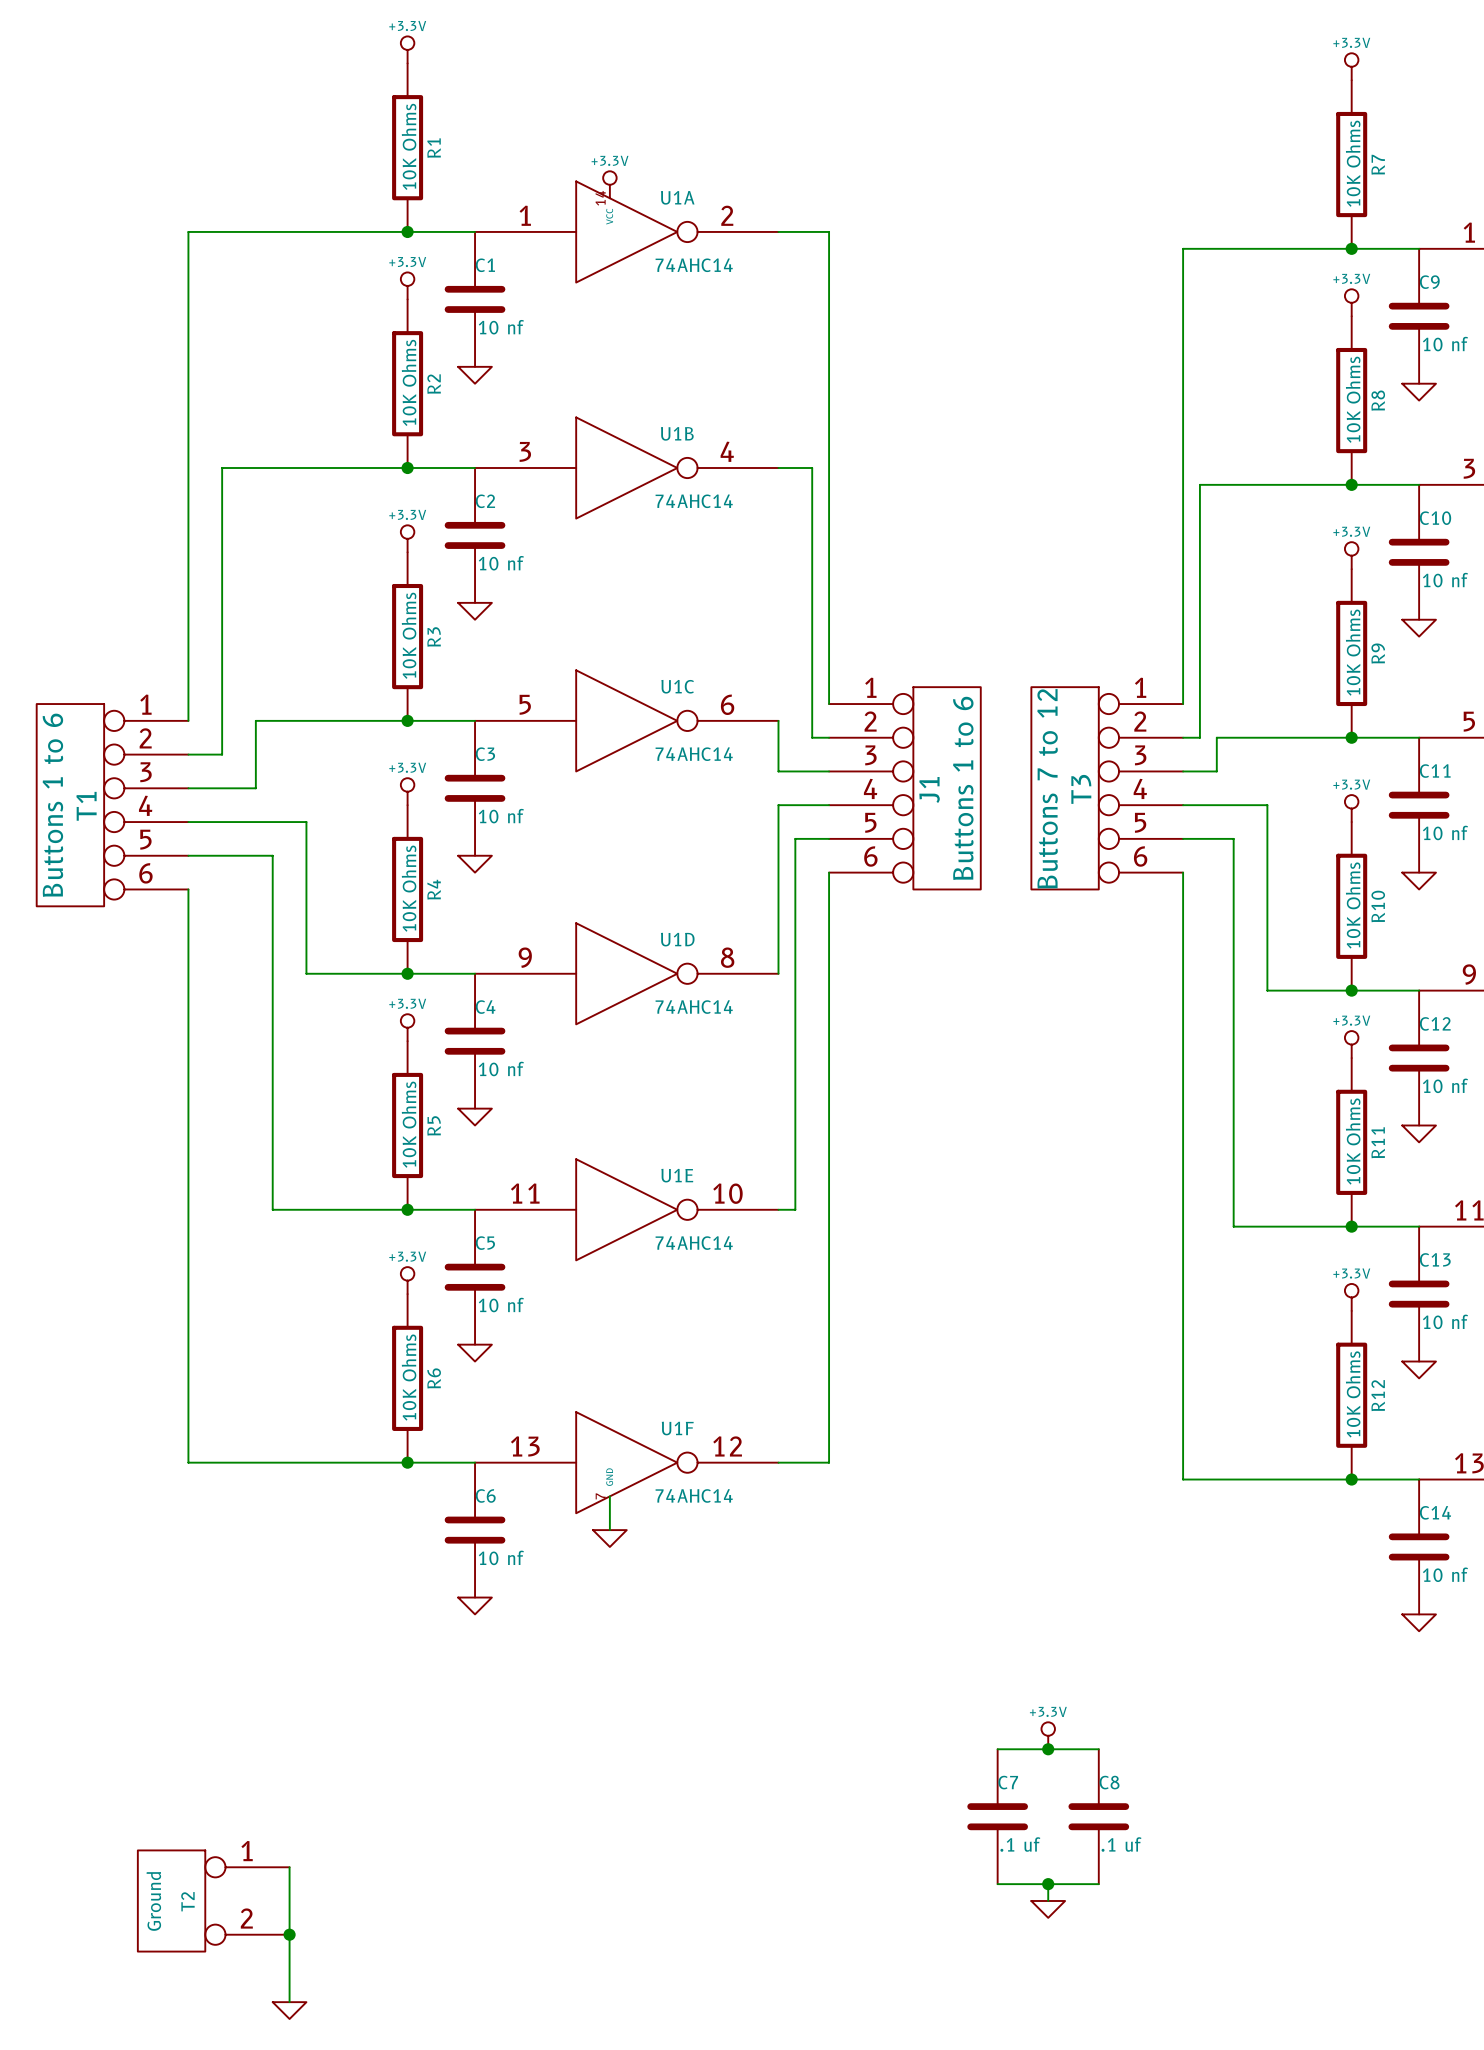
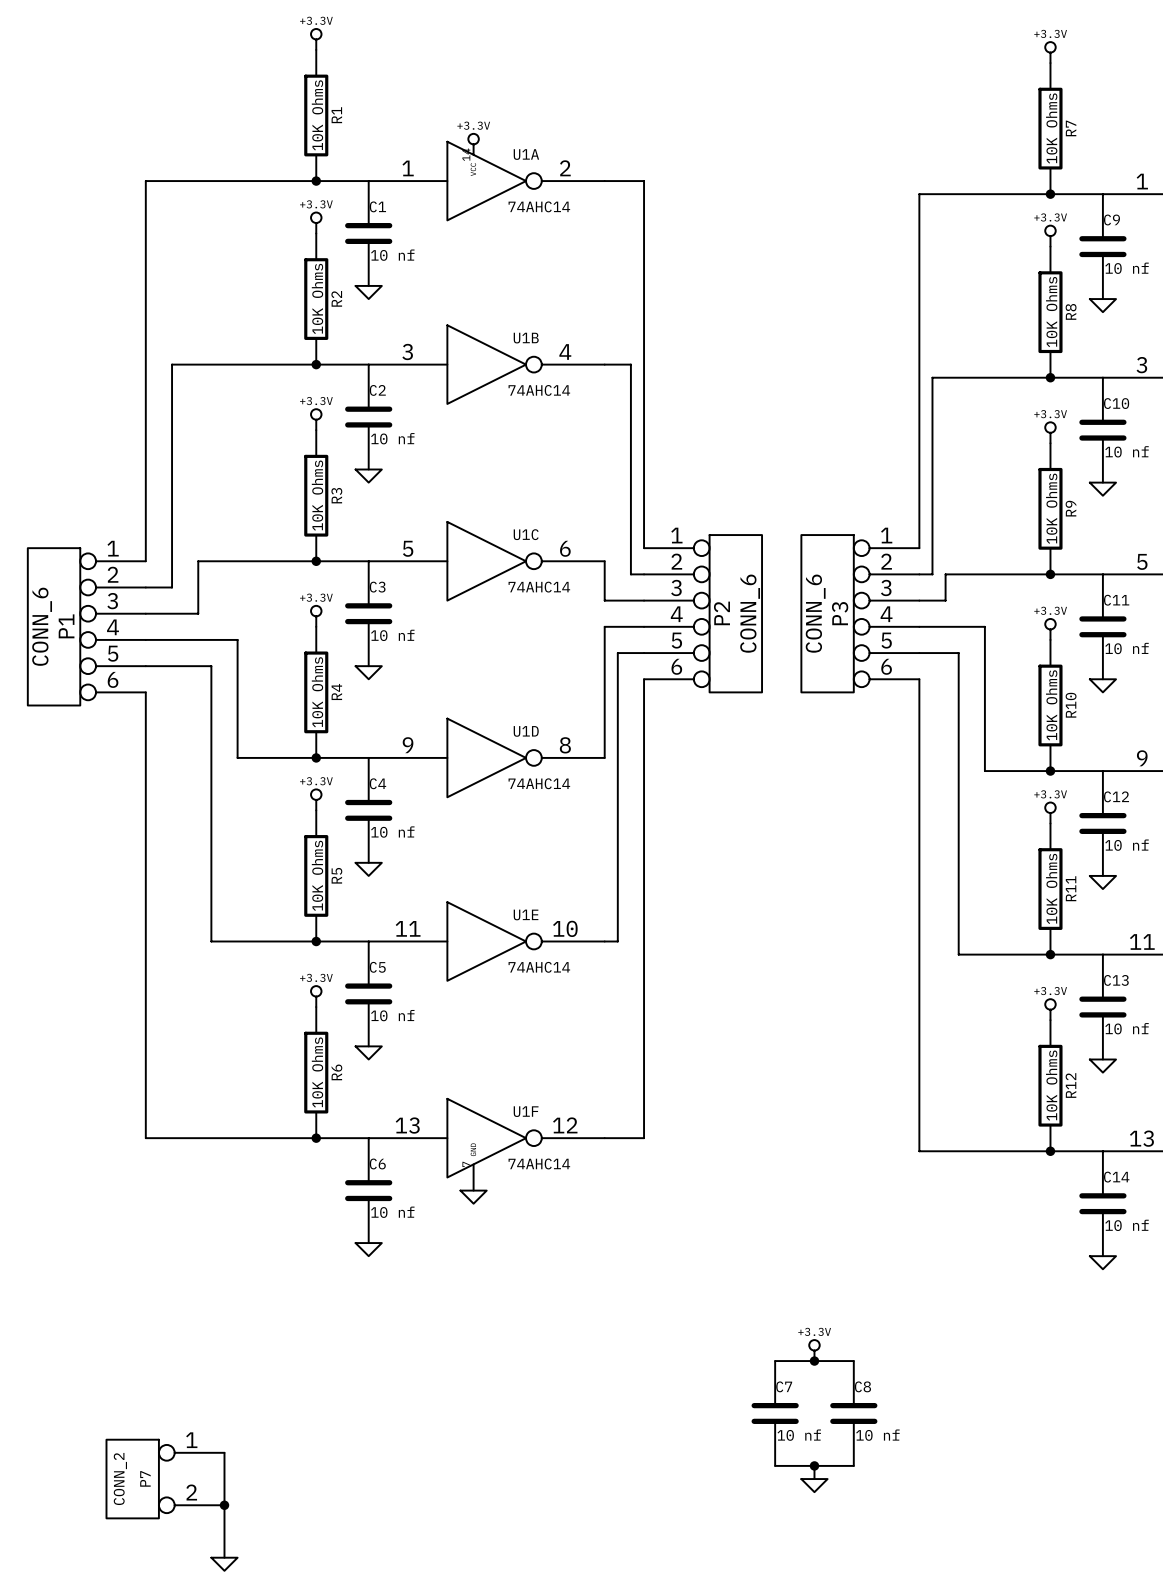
J1 value: Buttons 1 to 6 (963, 788) -> CONN_6 (750, 613)
T3 value: Buttons 7 to 12 (1047, 788) -> CONN_6 (815, 613)
J1 name: J1 (929, 789) -> P2 (721, 613)
T3 name: T3 (1081, 789) -> P3 (840, 613)
T1 value: Buttons 1 to 6 (52, 805) -> CONN_6 (42, 626)
T1 name: T1 (86, 806) -> P1 (66, 626)
C7 value: .1 uf (1020, 1844) -> 10 nf (799, 1435)
C8 value: .1 uf (1121, 1844) -> 10 nf (877, 1435)
T2 value: Ground (153, 1901) -> CONN_2 (120, 1478)
T2 name: T2 (187, 1901) -> P7 (145, 1478)

